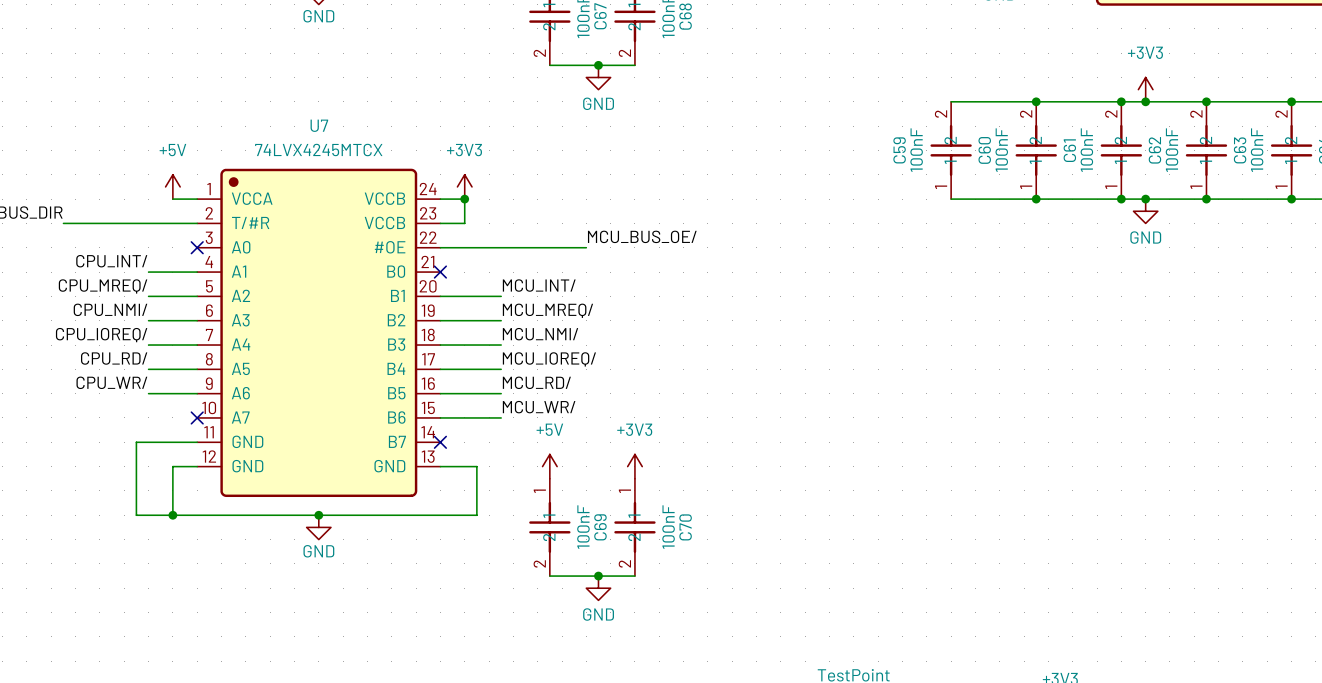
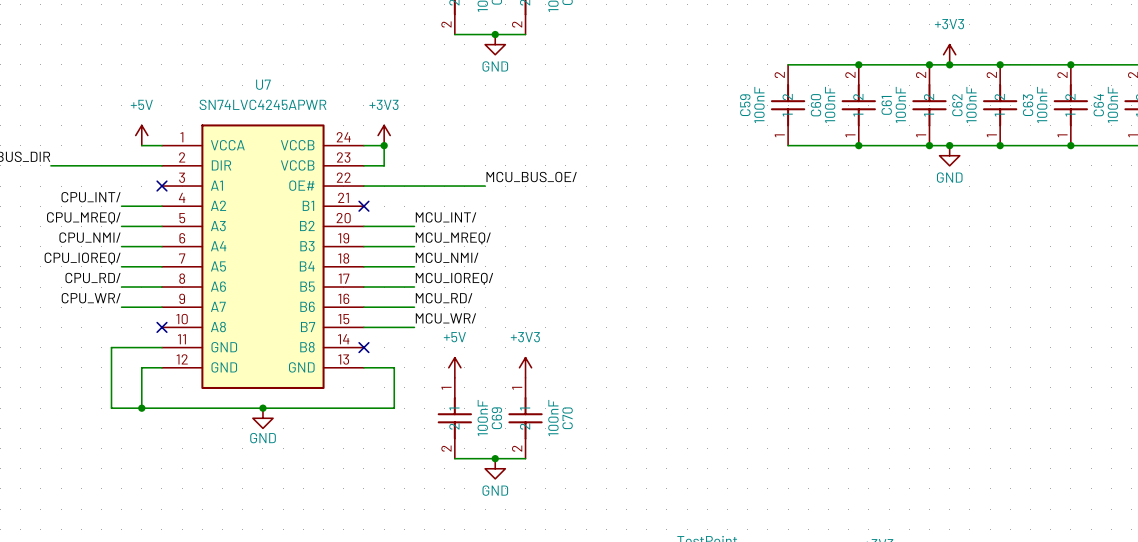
U7 value: 74LVX4245MTCX (318, 150) -> SN74LVC4245APWR (262, 104)
U7 symbol: [197, 168, 441, 498] -> [161, 124, 364, 389]

